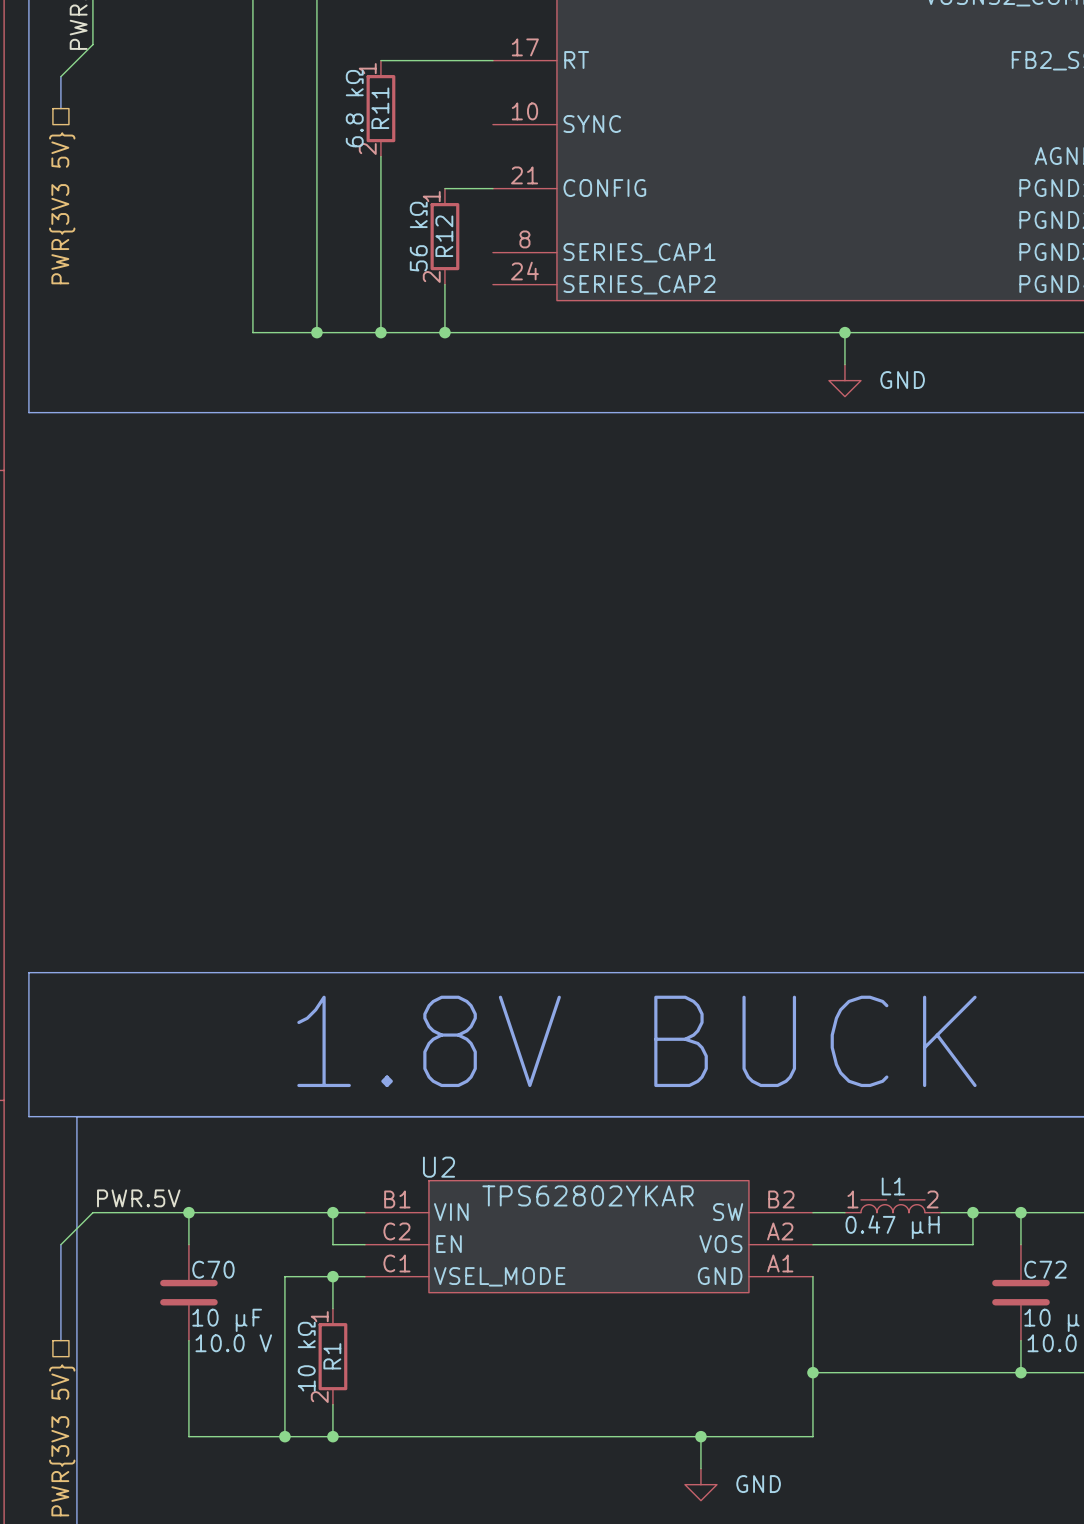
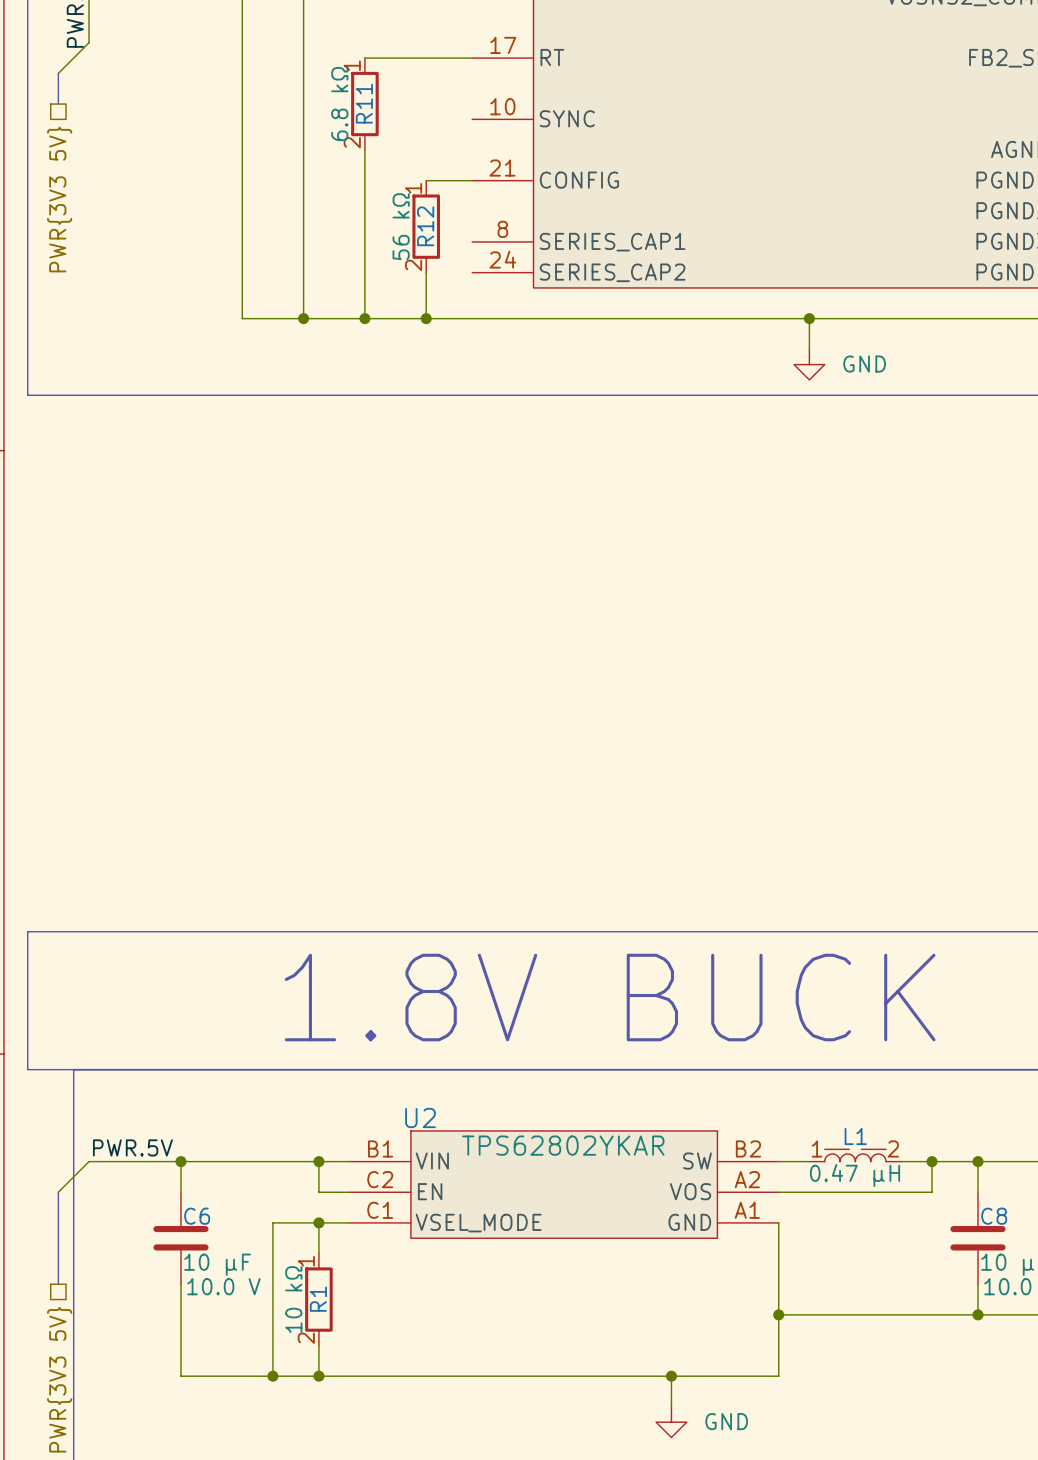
C70 name: C70 (213, 1269) -> C6 (197, 1216)
C72 name: C72 (1045, 1269) -> C8 (994, 1216)

